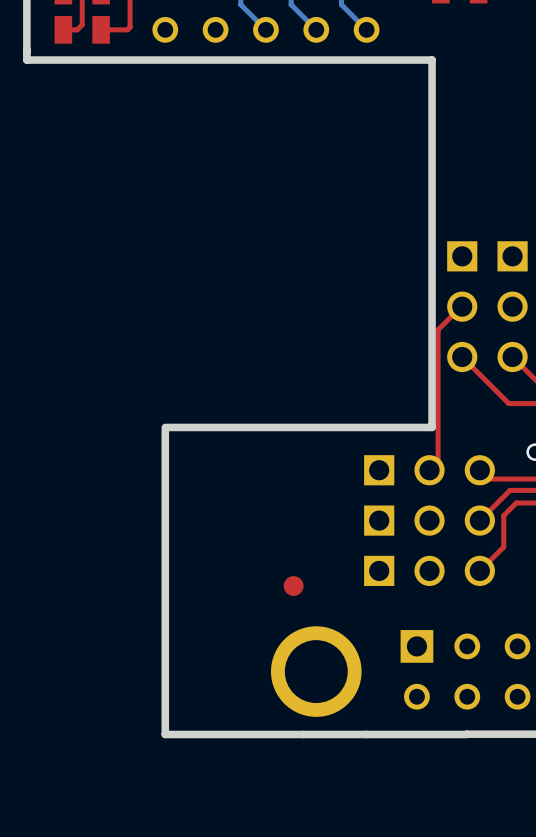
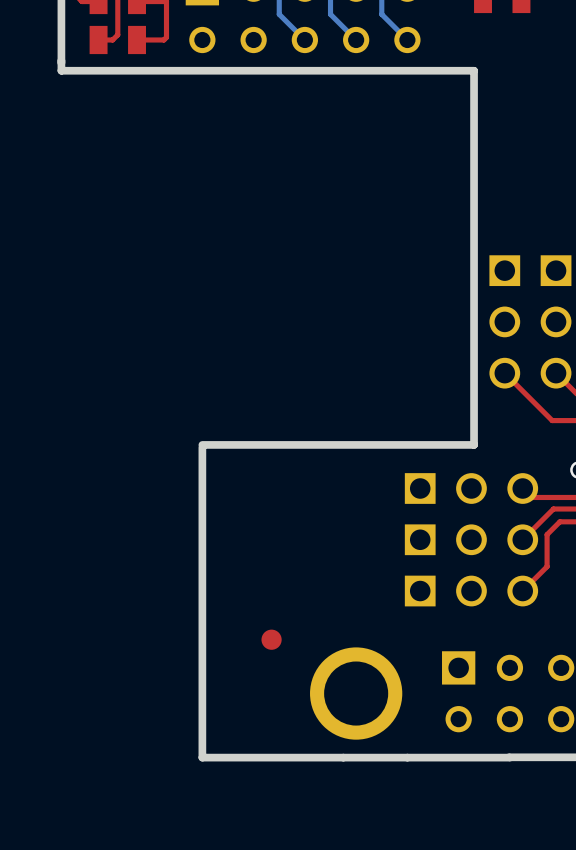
top track: (462, 306) (438, 329) (438, 461) -> none
part position: (293, 586) -> (271, 639)

